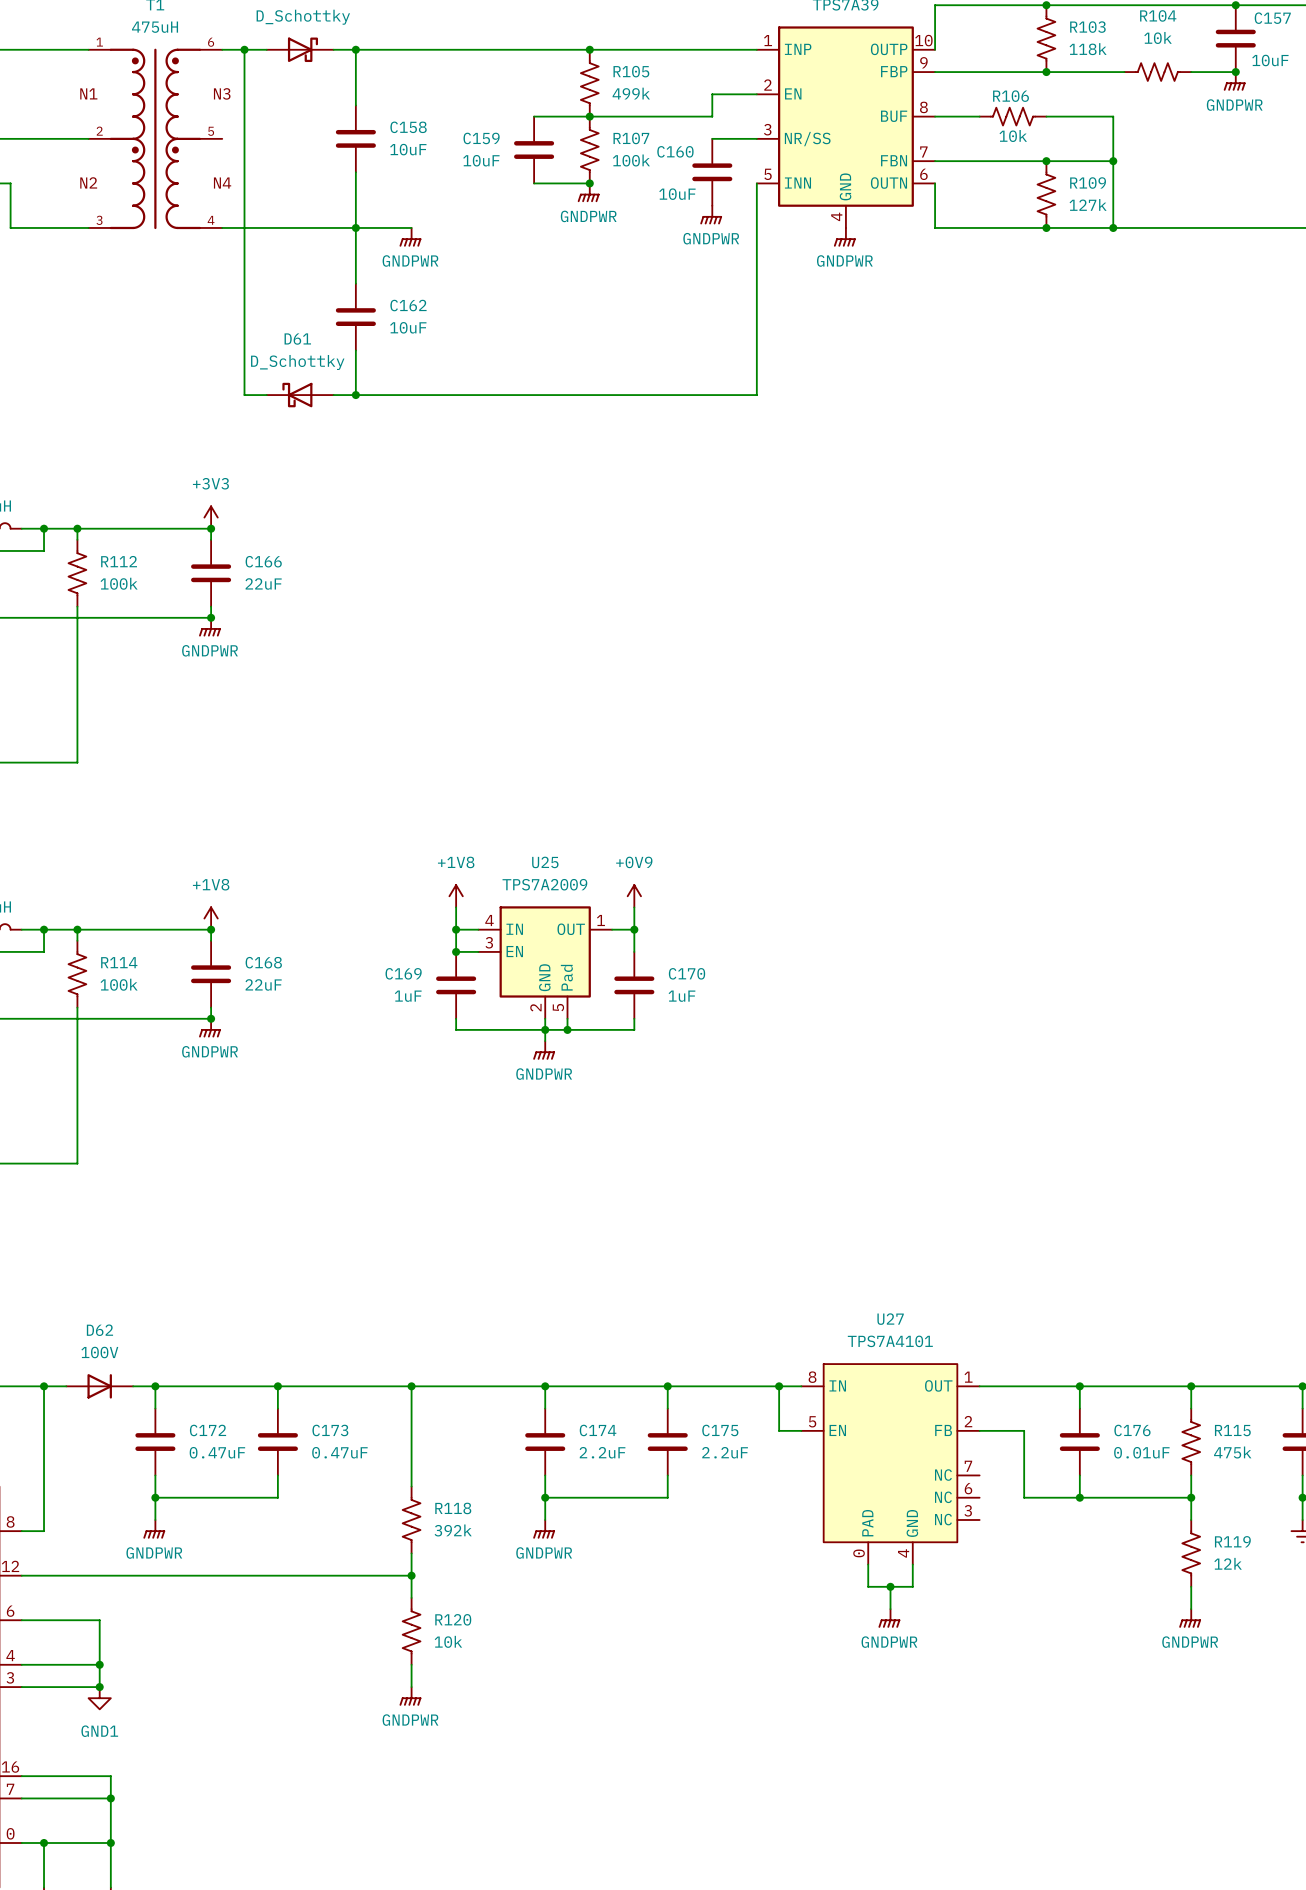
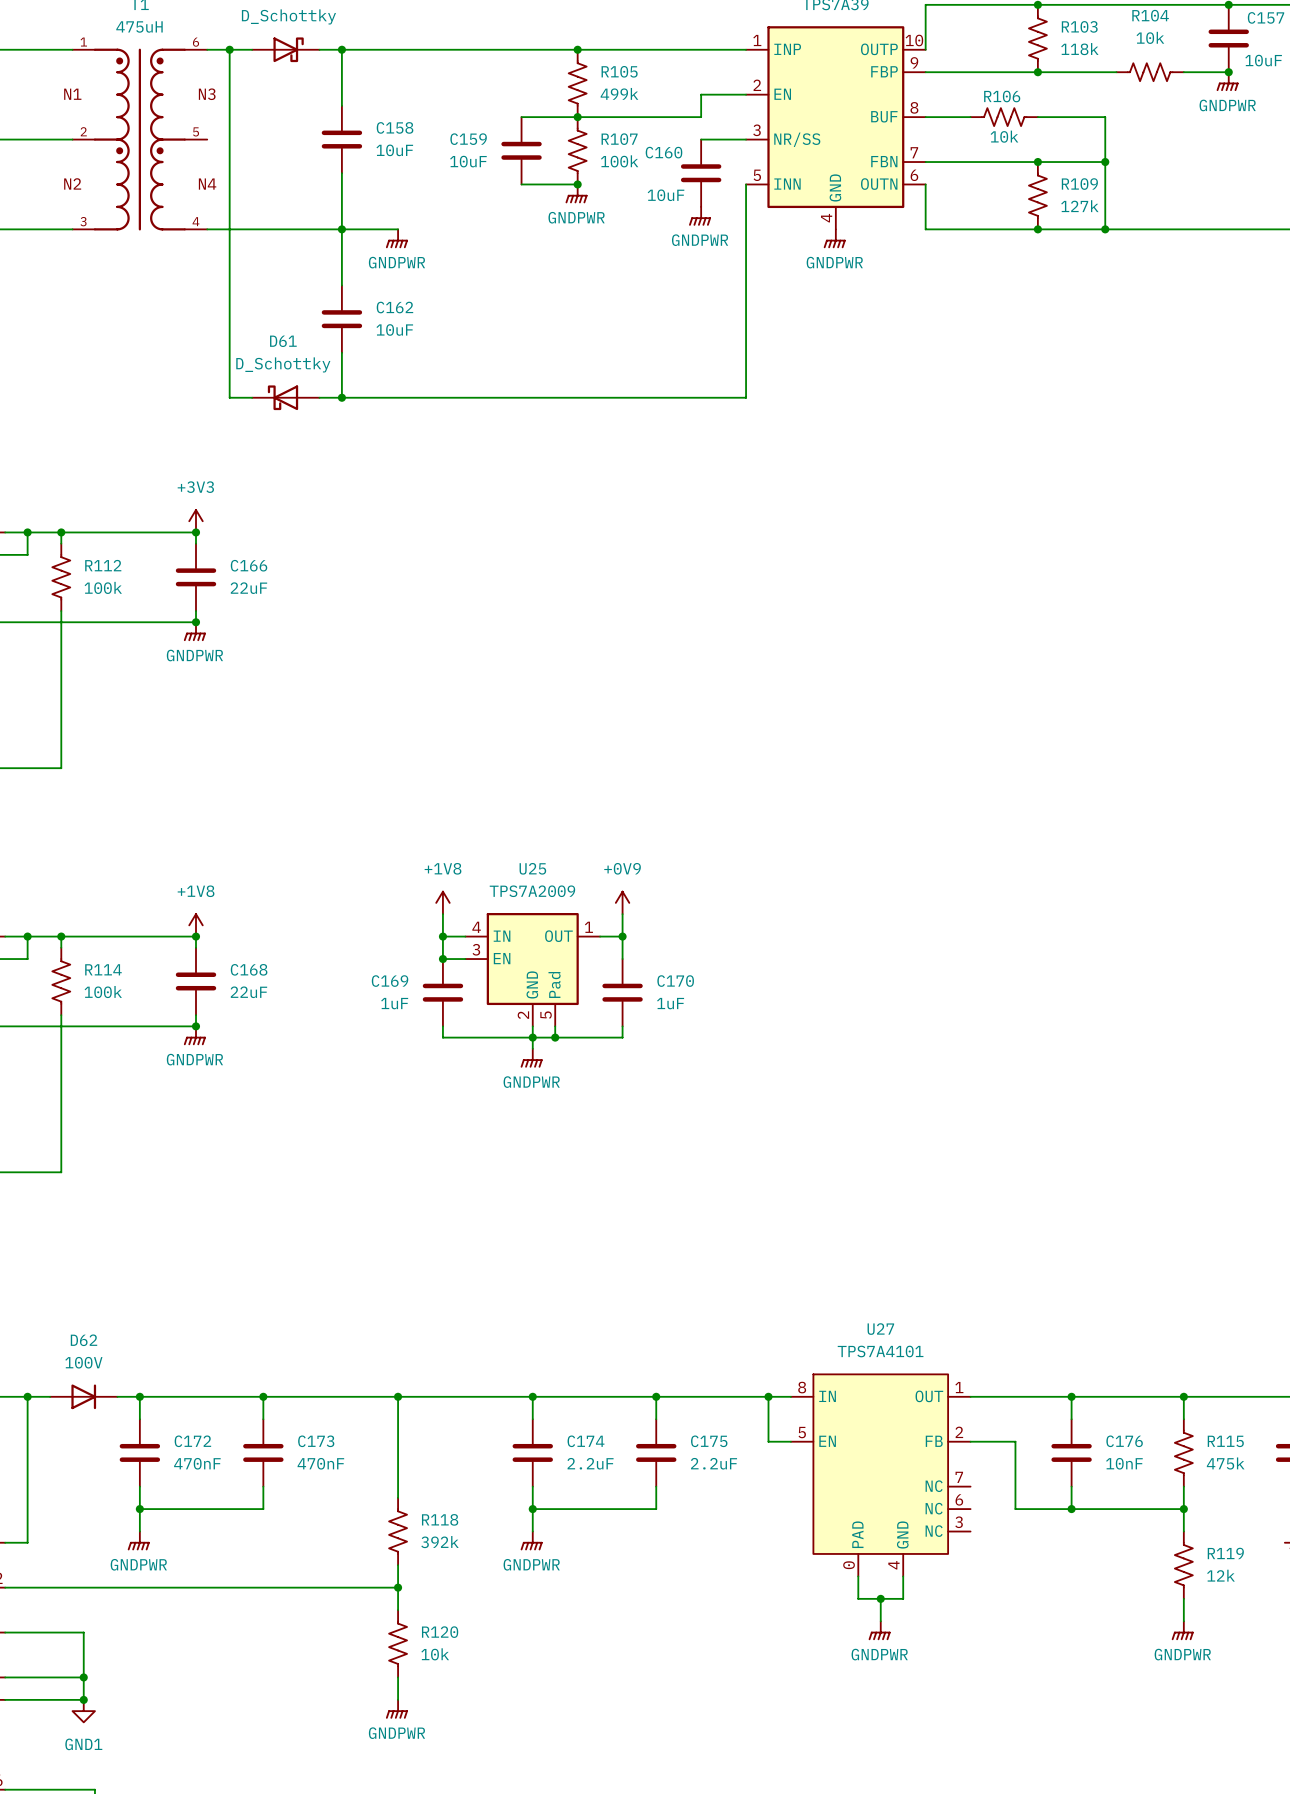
C172 value: 0.47uF (217, 1452) -> 470nF (197, 1463)
C173 value: 0.47uF (339, 1452) -> 470nF (320, 1463)
C176 value: 0.01uF (1141, 1452) -> 10nF (1124, 1463)

